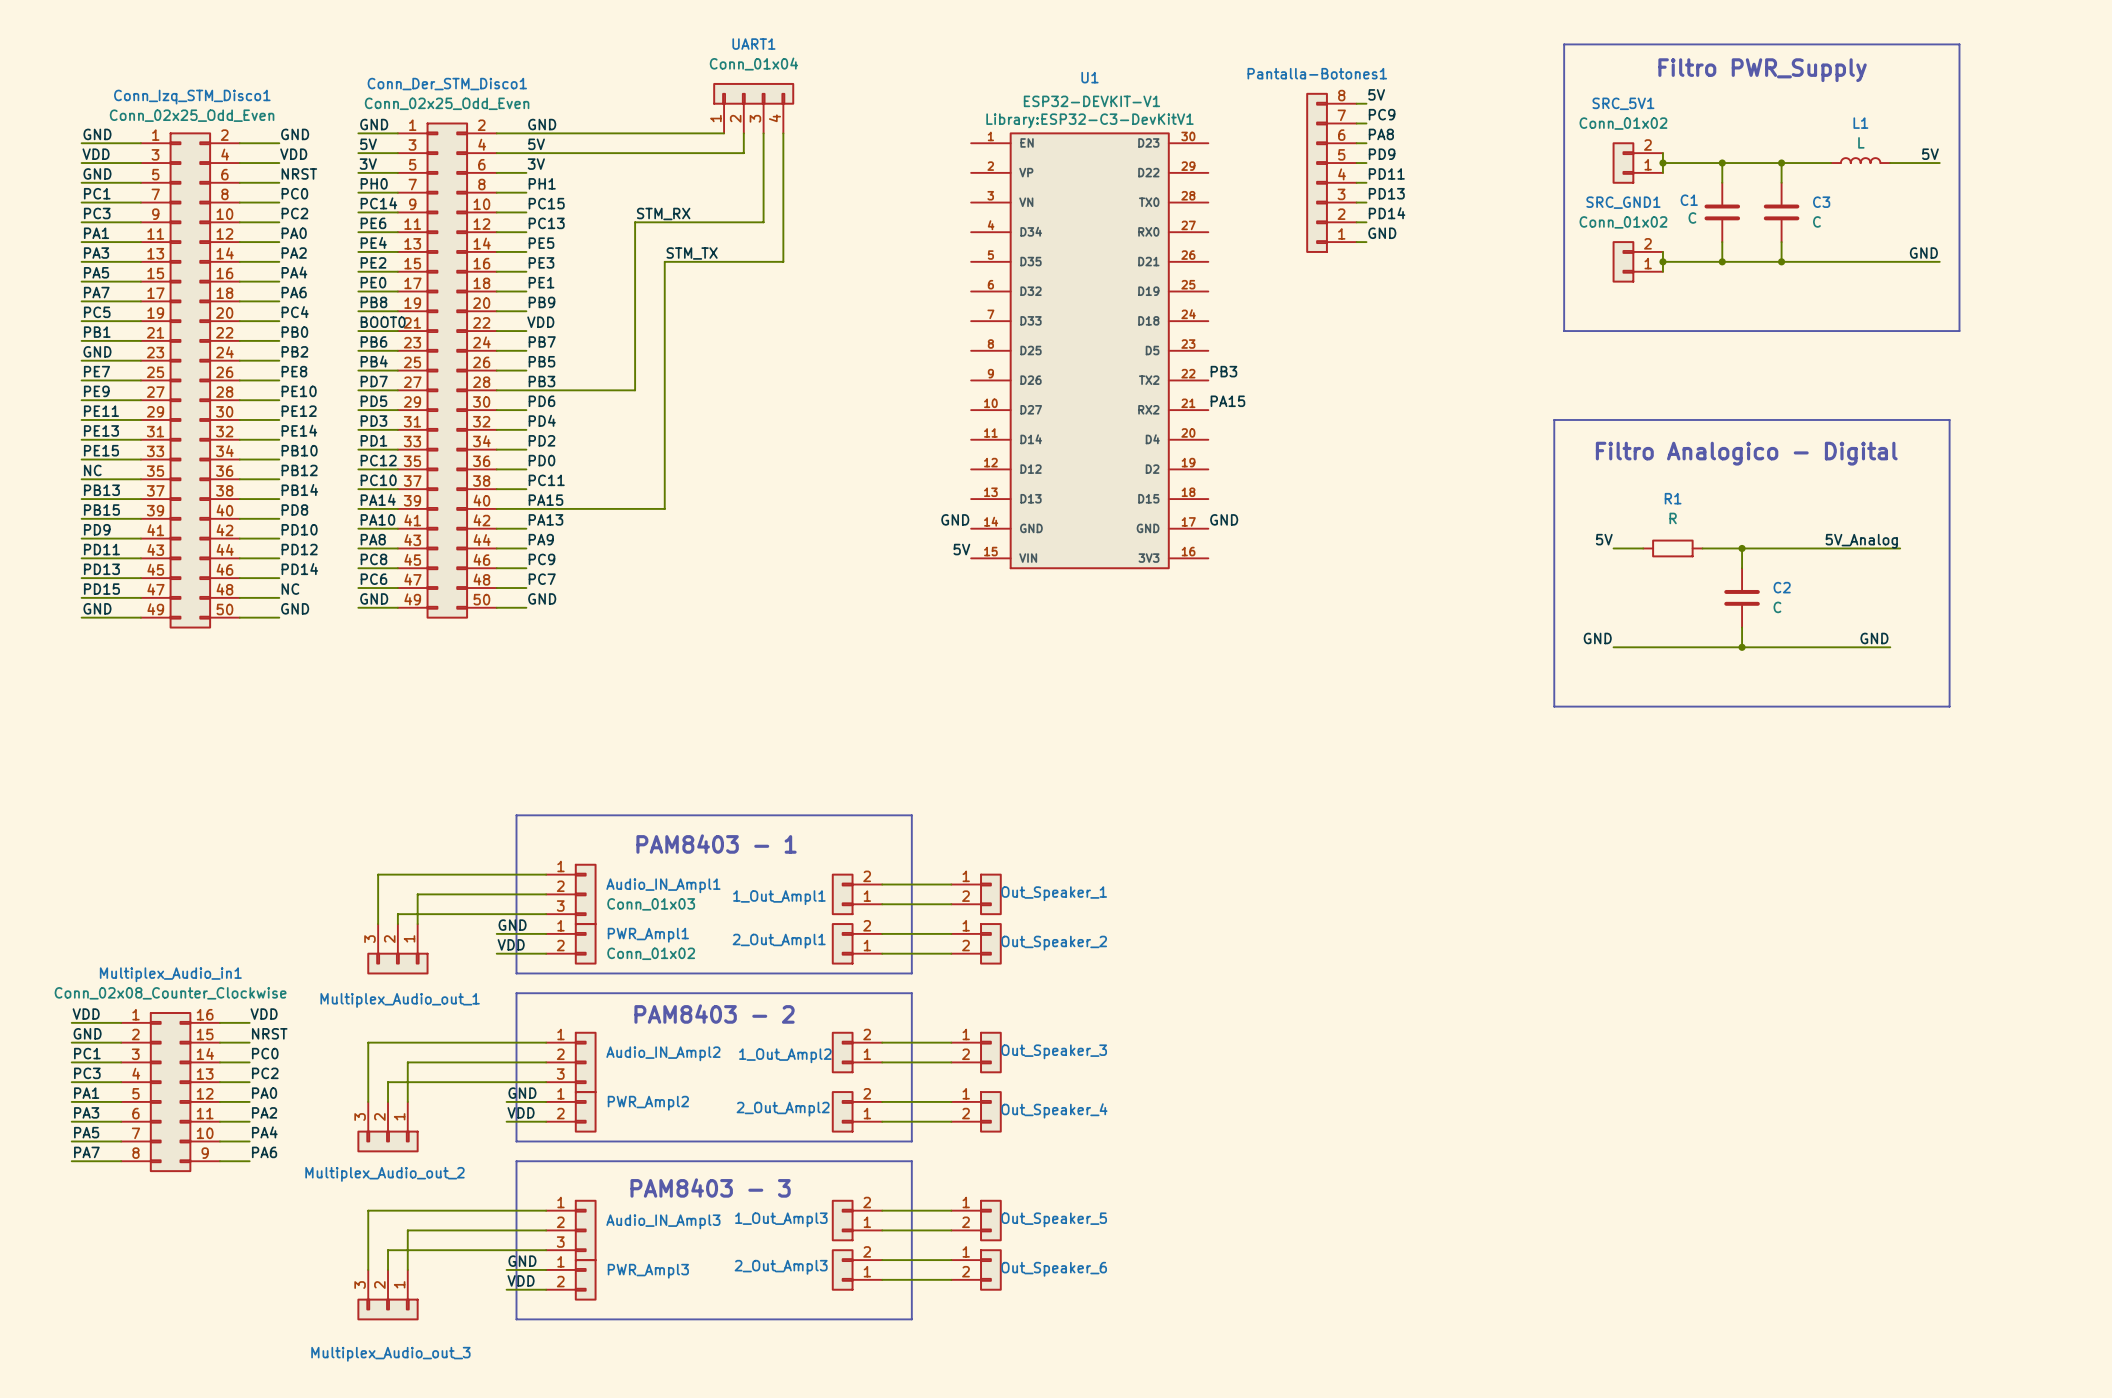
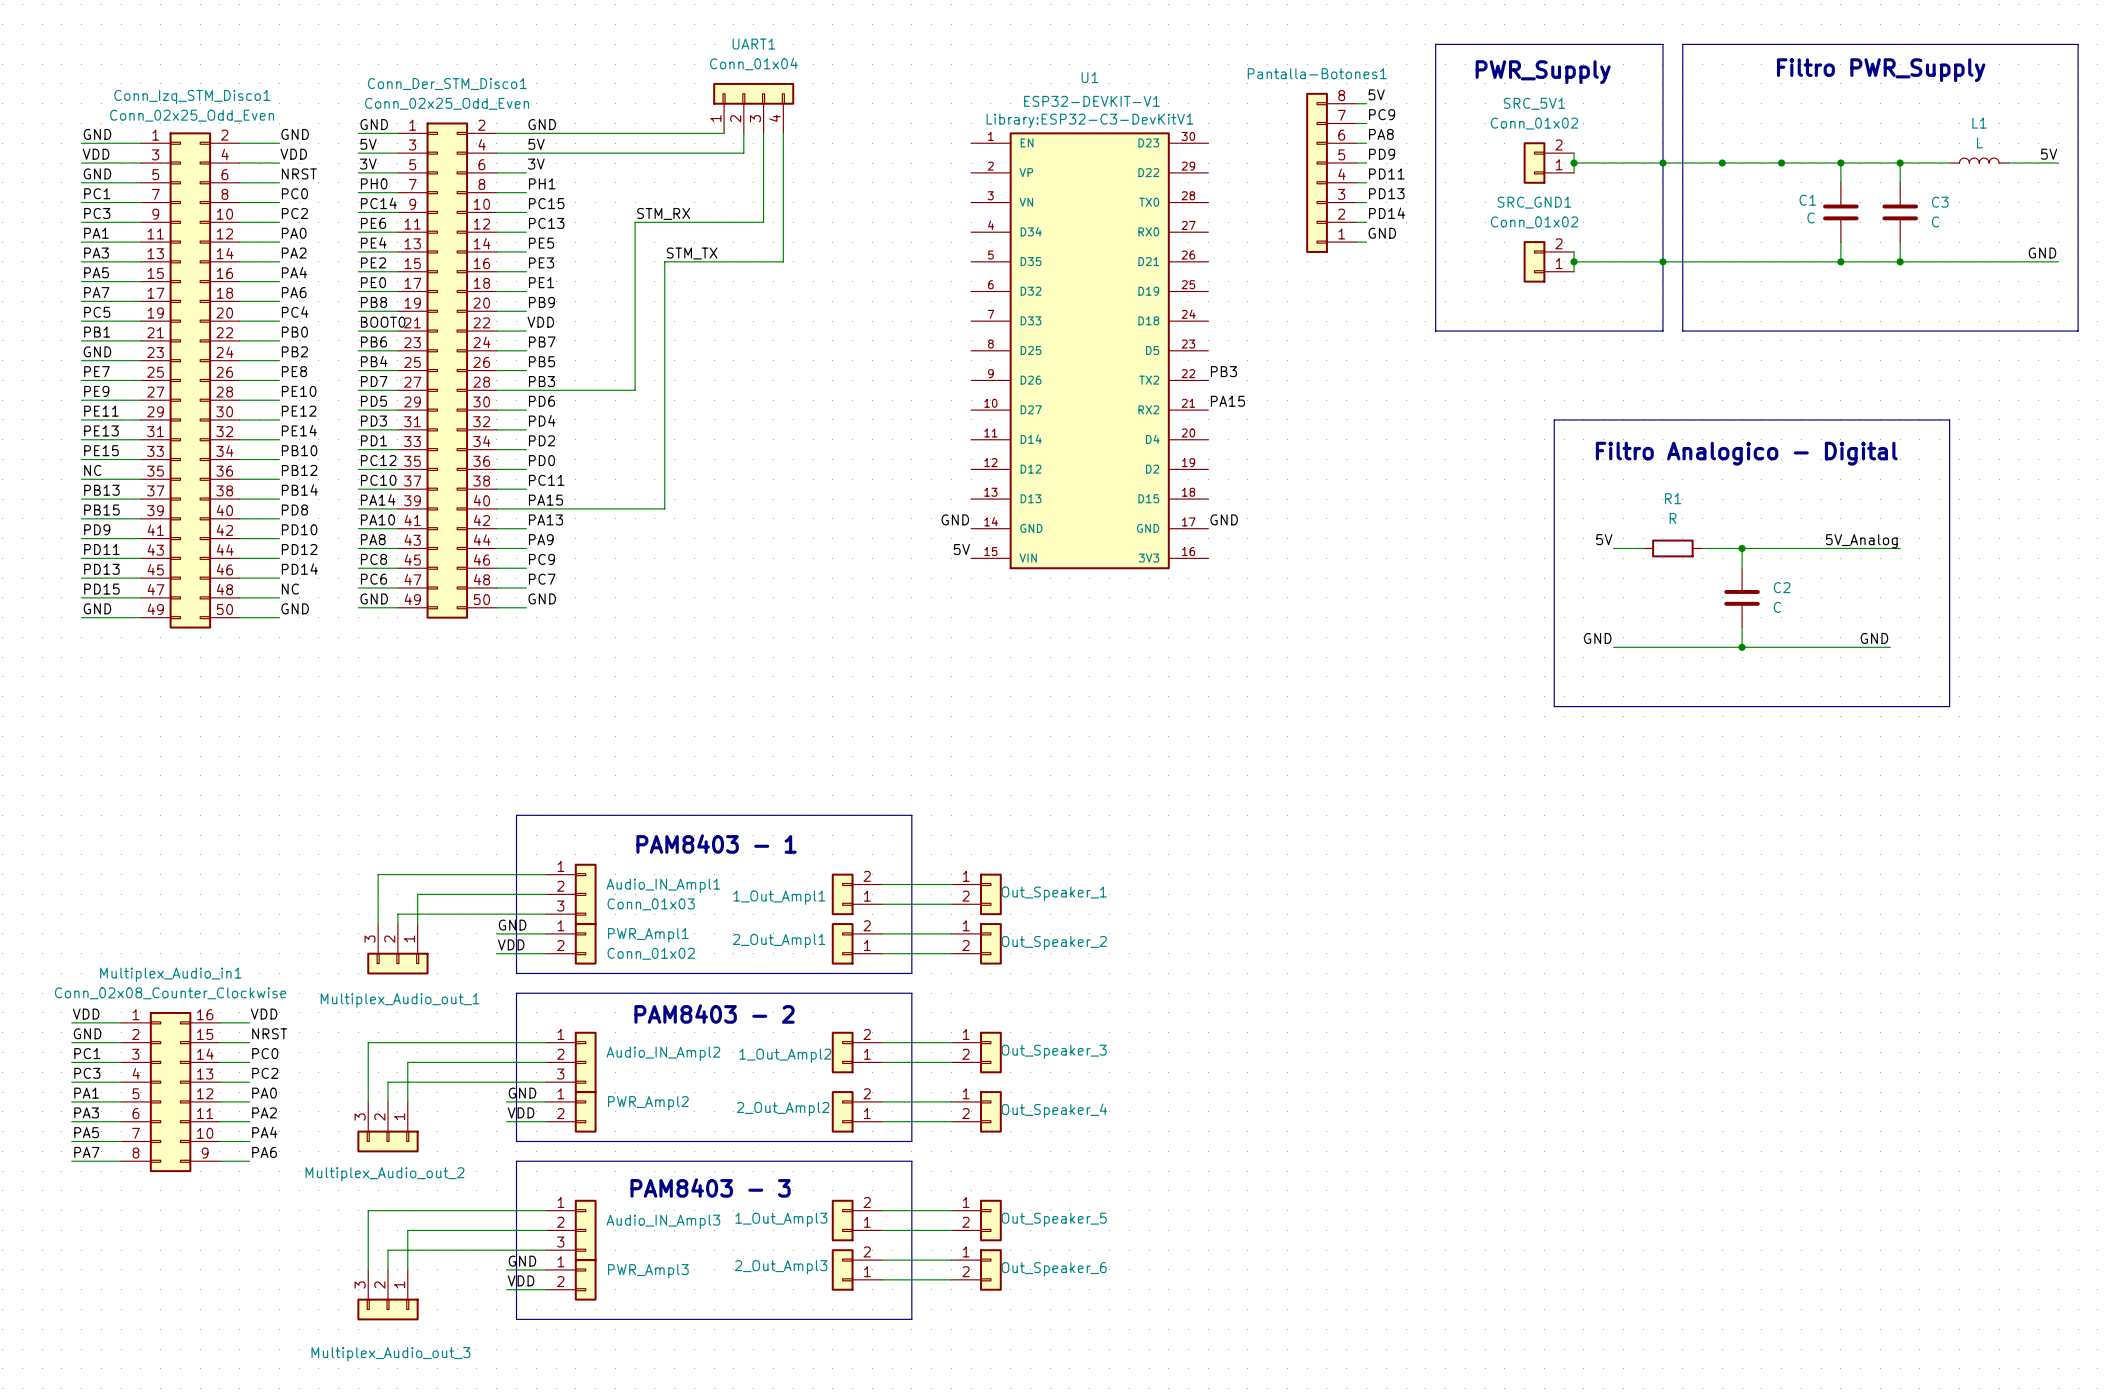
line: (1564, 44) (1564, 331) -> (1564, 44) (1435, 44) (1435, 331) (1564, 331)
line: (1662, 44) (1682, 44) -> (1662, 44) (1662, 331)
line: (1959, 44) (1959, 331) -> (1959, 44) (2078, 44) (2078, 331) (1959, 331)
text position: Filtro PWR_Supply (1762, 70) -> Filtro PWR_Supply (1881, 70)
text: none -> PWR_Supply (1543, 72)
label position: 5V (1930, 154) -> 5V (2049, 154)
L1 position: (1860, 160) -> (1979, 160)
wire: none -> (1574, 163) (1662, 163)
junction: none -> (1574, 163)
SRC_5V1 position: (1637, 163) -> (1548, 163)
wire: (1722, 163) (1722, 182) -> (1840, 163) (1840, 182)
wire: (1781, 163) (1781, 182) -> (1900, 163) (1900, 182)
wire: none -> (1831, 163) (1890, 163)
junction: none -> (1840, 163)
junction: none -> (1900, 163)
wire: none -> (1939, 163) (1949, 163)
wire: none -> (2008, 163) (2058, 163)
C1 position: (1722, 212) -> (1840, 212)
C3 position: (1781, 212) -> (1900, 212)
wire: (1722, 242) (1722, 261) -> (1840, 242) (1840, 261)
wire: (1781, 242) (1781, 261) -> (1900, 242) (1900, 261)
label position: GND (1923, 253) -> GND (2042, 253)
wire: none -> (1574, 261) (1662, 261)
junction: none -> (1574, 261)
SRC_GND1 position: (1637, 261) -> (1548, 261)
junction: (1722, 261) -> none
junction: (1781, 261) -> none
junction: none -> (1840, 261)
junction: none -> (1900, 261)
wire: none -> (1939, 261) (2058, 261)
line: (1662, 331) (1682, 331) -> (1682, 44) (1682, 331)

